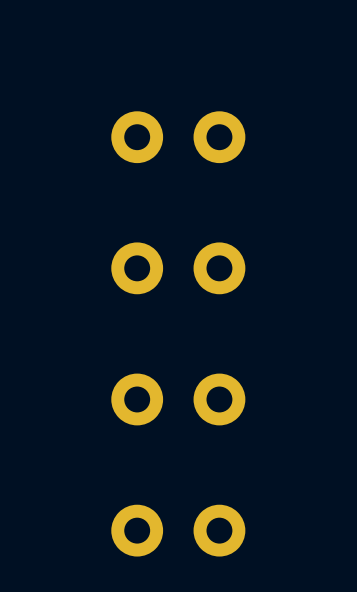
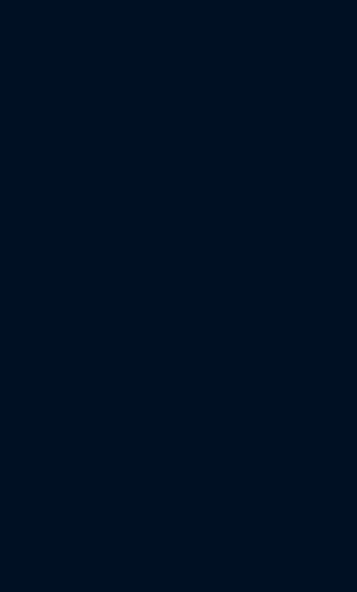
part: (178, 137) -> none
part: (178, 268) -> none
part: (178, 399) -> none
part: (178, 530) -> none

